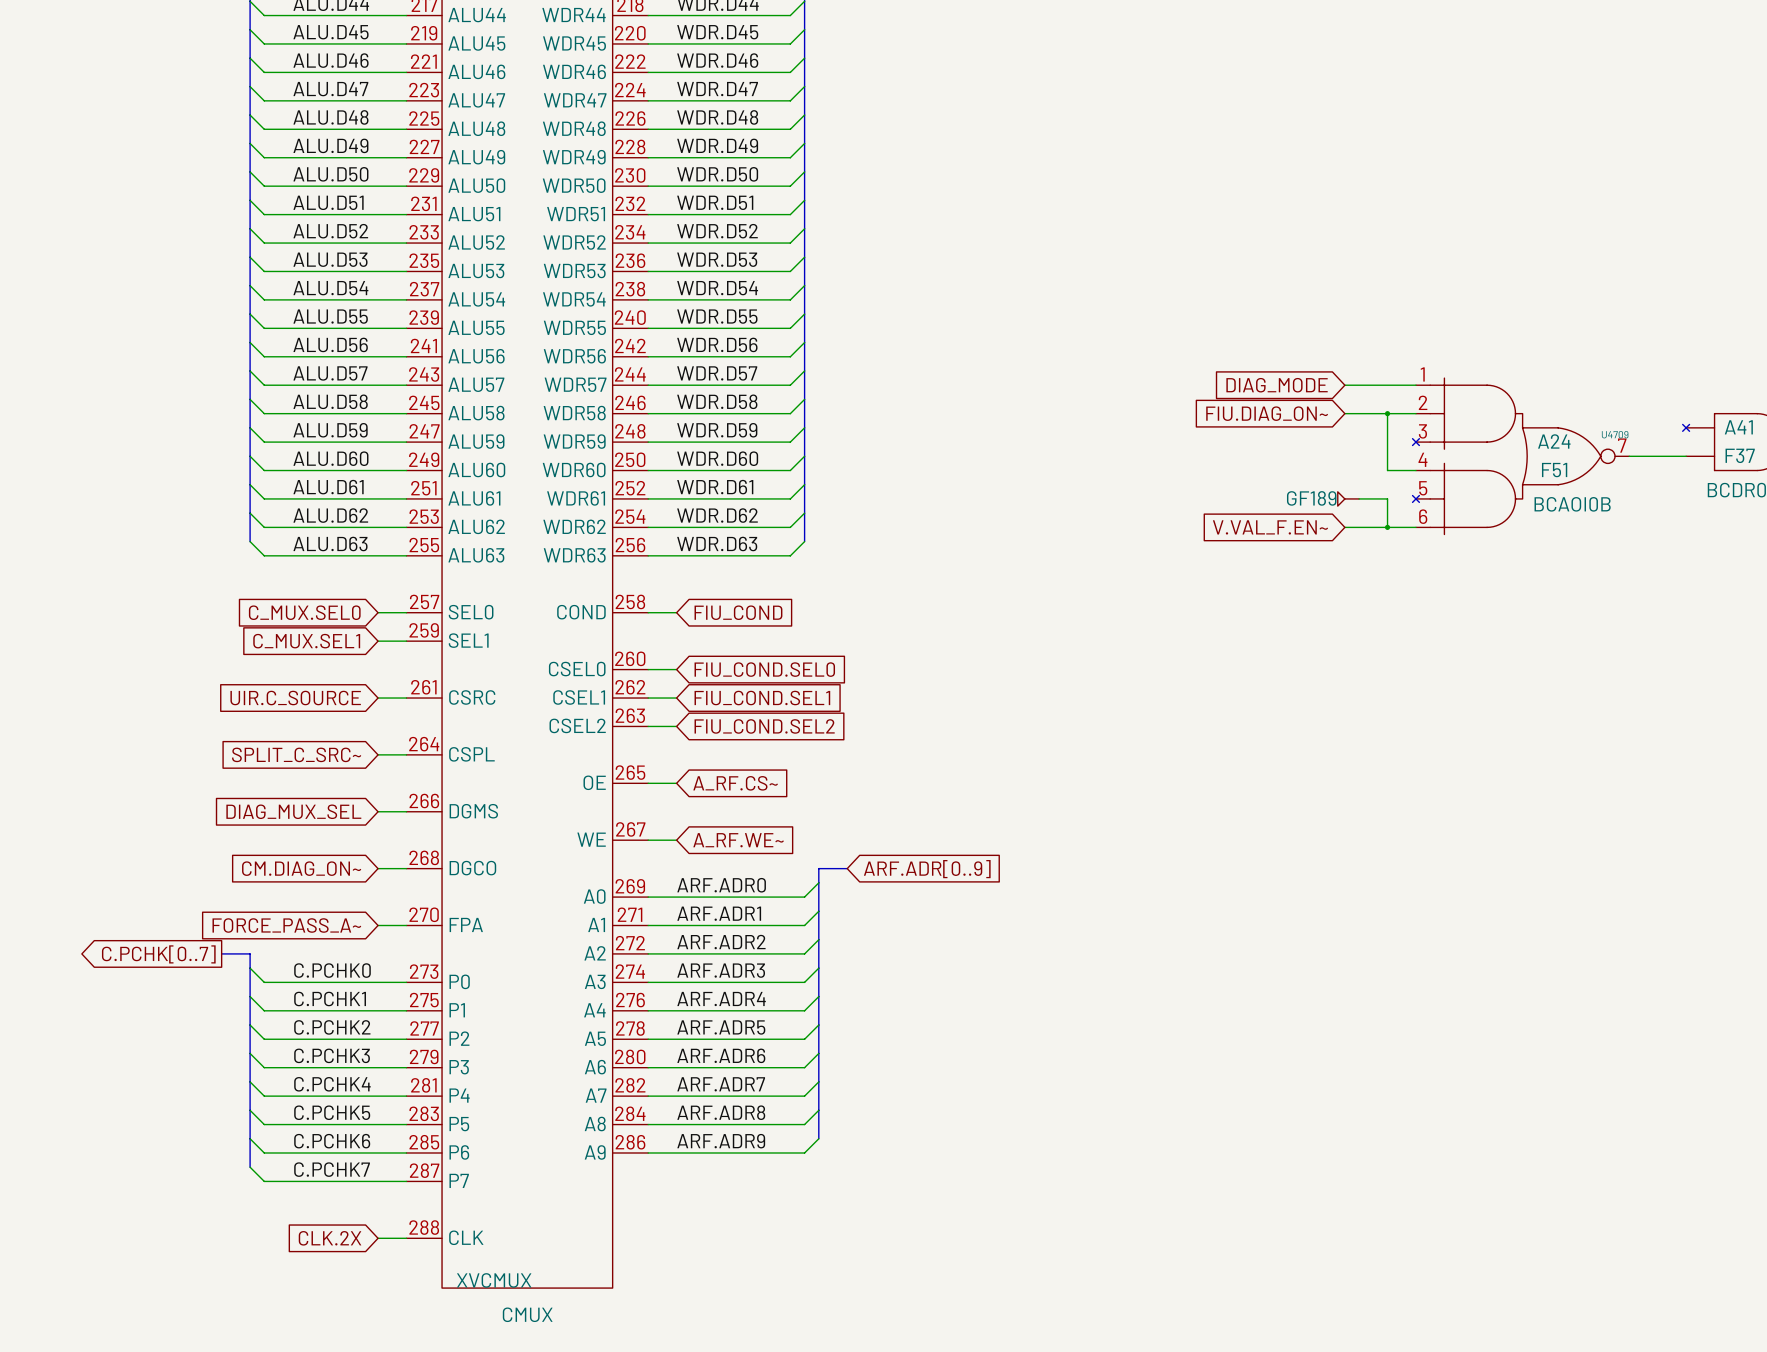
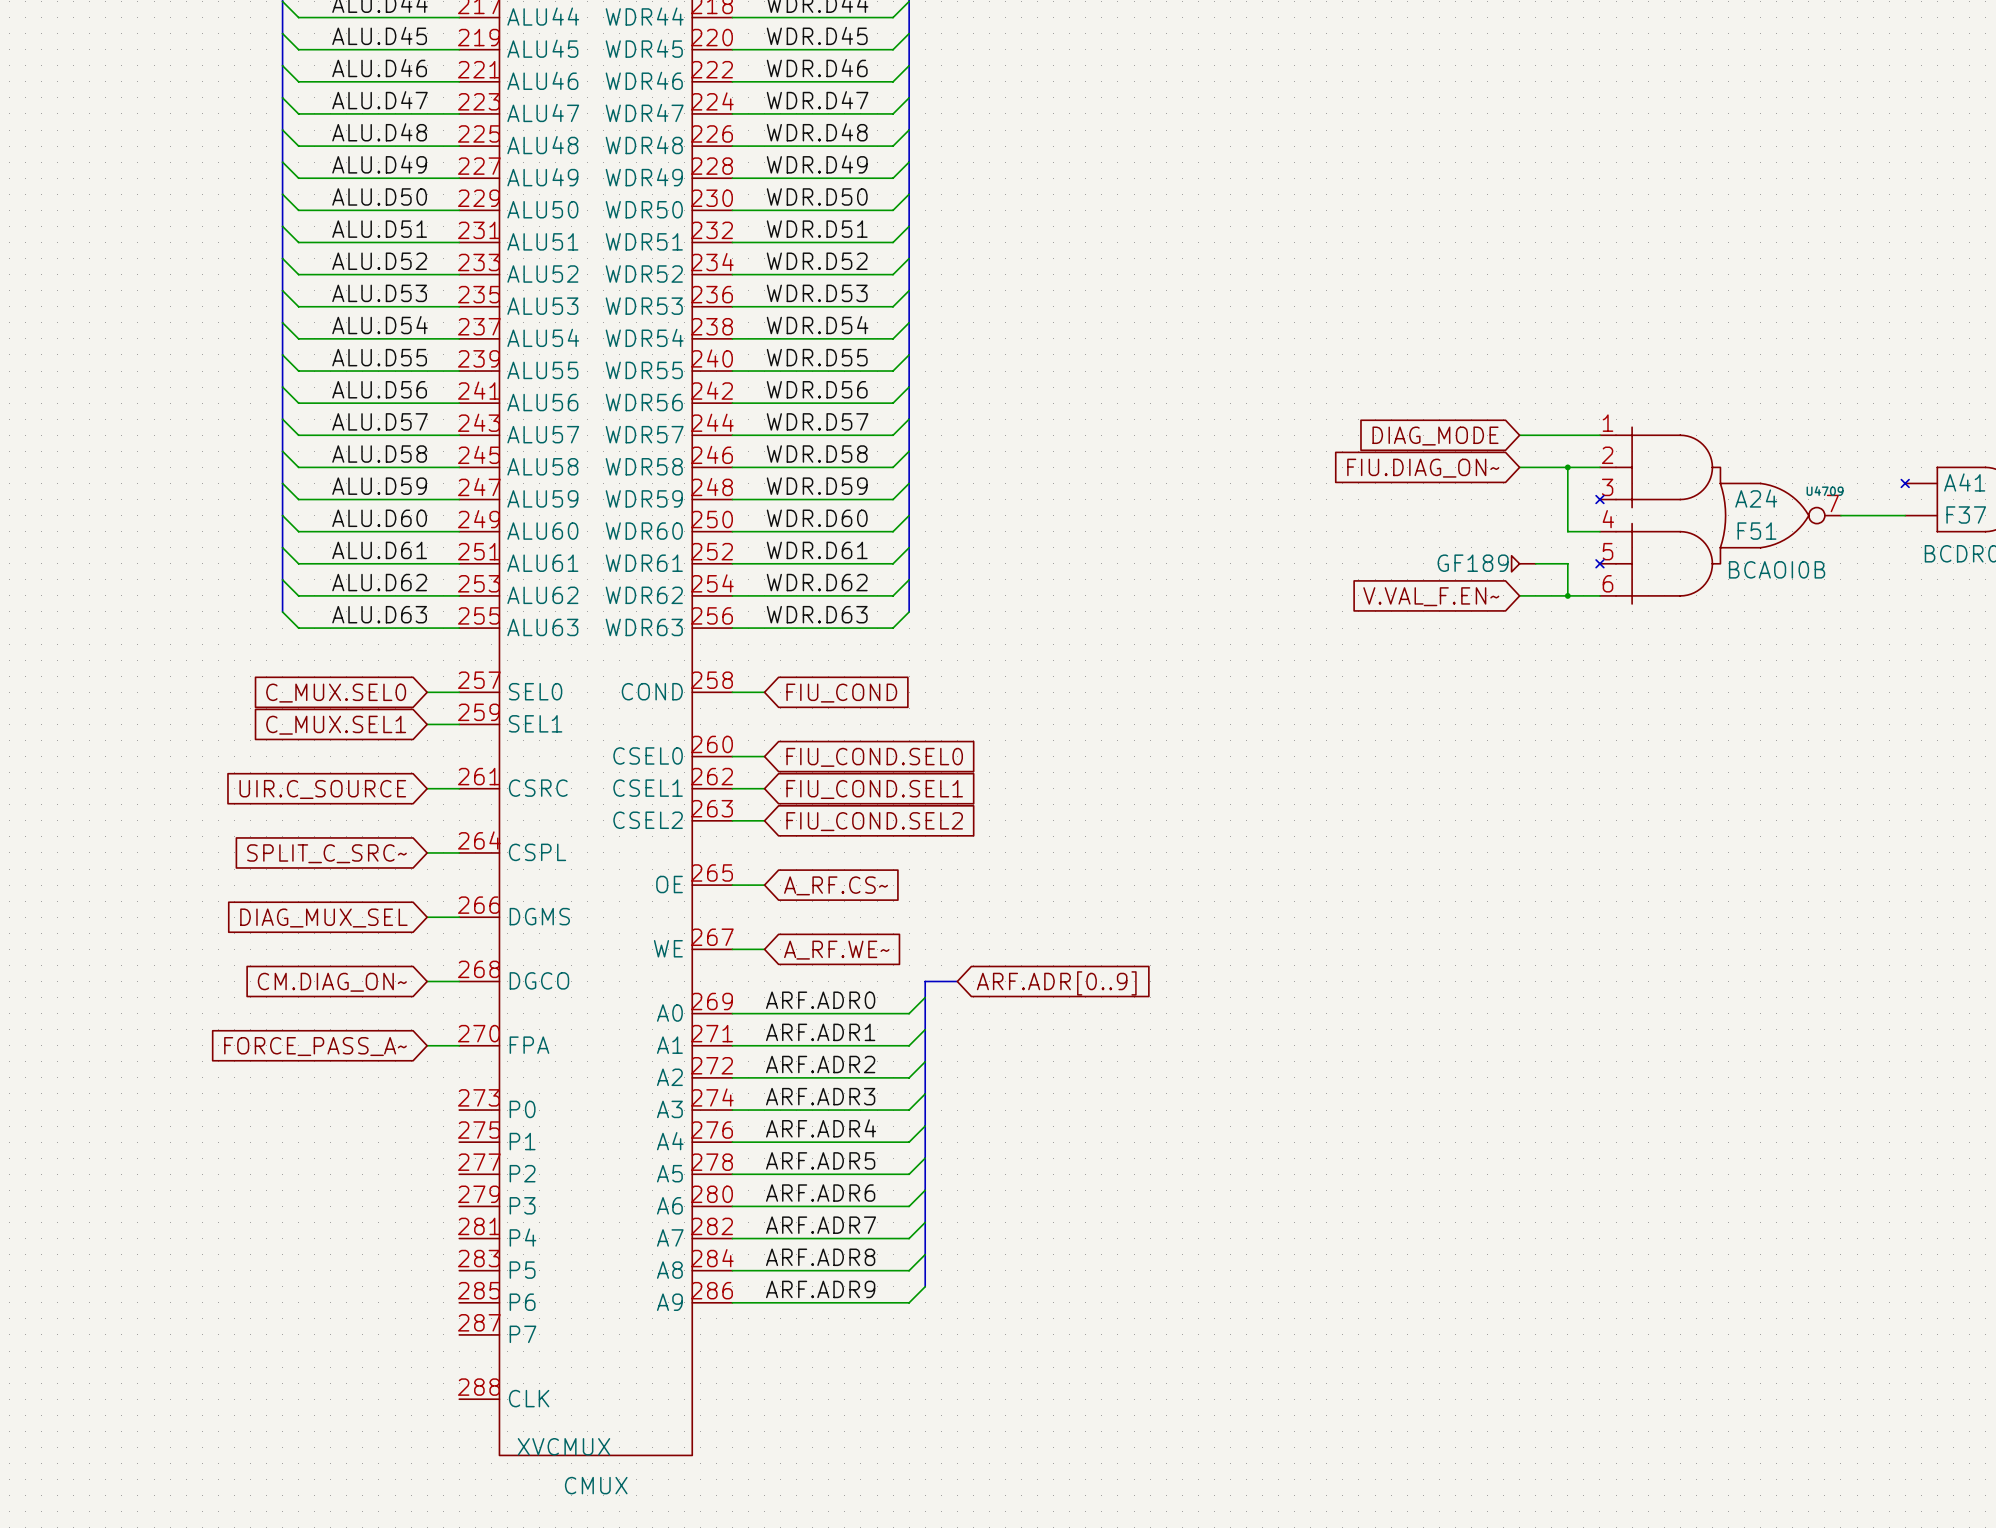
bus: (221, 953) (250, 953) (250, 1167) -> none
global label: C.PCHK[0..7] (158, 954) -> none
wire: (250, 968) (264, 982) (406, 982) -> none
label: C.PCHK0 (332, 970) -> none
wire: (250, 996) (264, 1010) (406, 1010) -> none
label: C.PCHK1 (330, 998) -> none
wire: (250, 1025) (264, 1039) (406, 1039) -> none
label: C.PCHK2 (332, 1027) -> none
wire: (250, 1053) (264, 1067) (406, 1067) -> none
label: C.PCHK3 (332, 1055) -> none
wire: (250, 1081) (264, 1096) (406, 1096) -> none
label: C.PCHK4 (332, 1084) -> none
wire: (250, 1110) (264, 1124) (406, 1124) -> none
label: C.PCHK5 (332, 1112) -> none
wire: (250, 1138) (264, 1152) (406, 1152) -> none
label: C.PCHK6 (332, 1141) -> none
wire: (250, 1167) (264, 1181) (406, 1181) -> none
label: C.PCHK7 (332, 1169) -> none
global label: CLK.2X (330, 1238) -> none
wire: (378, 1238) (406, 1238) -> none

